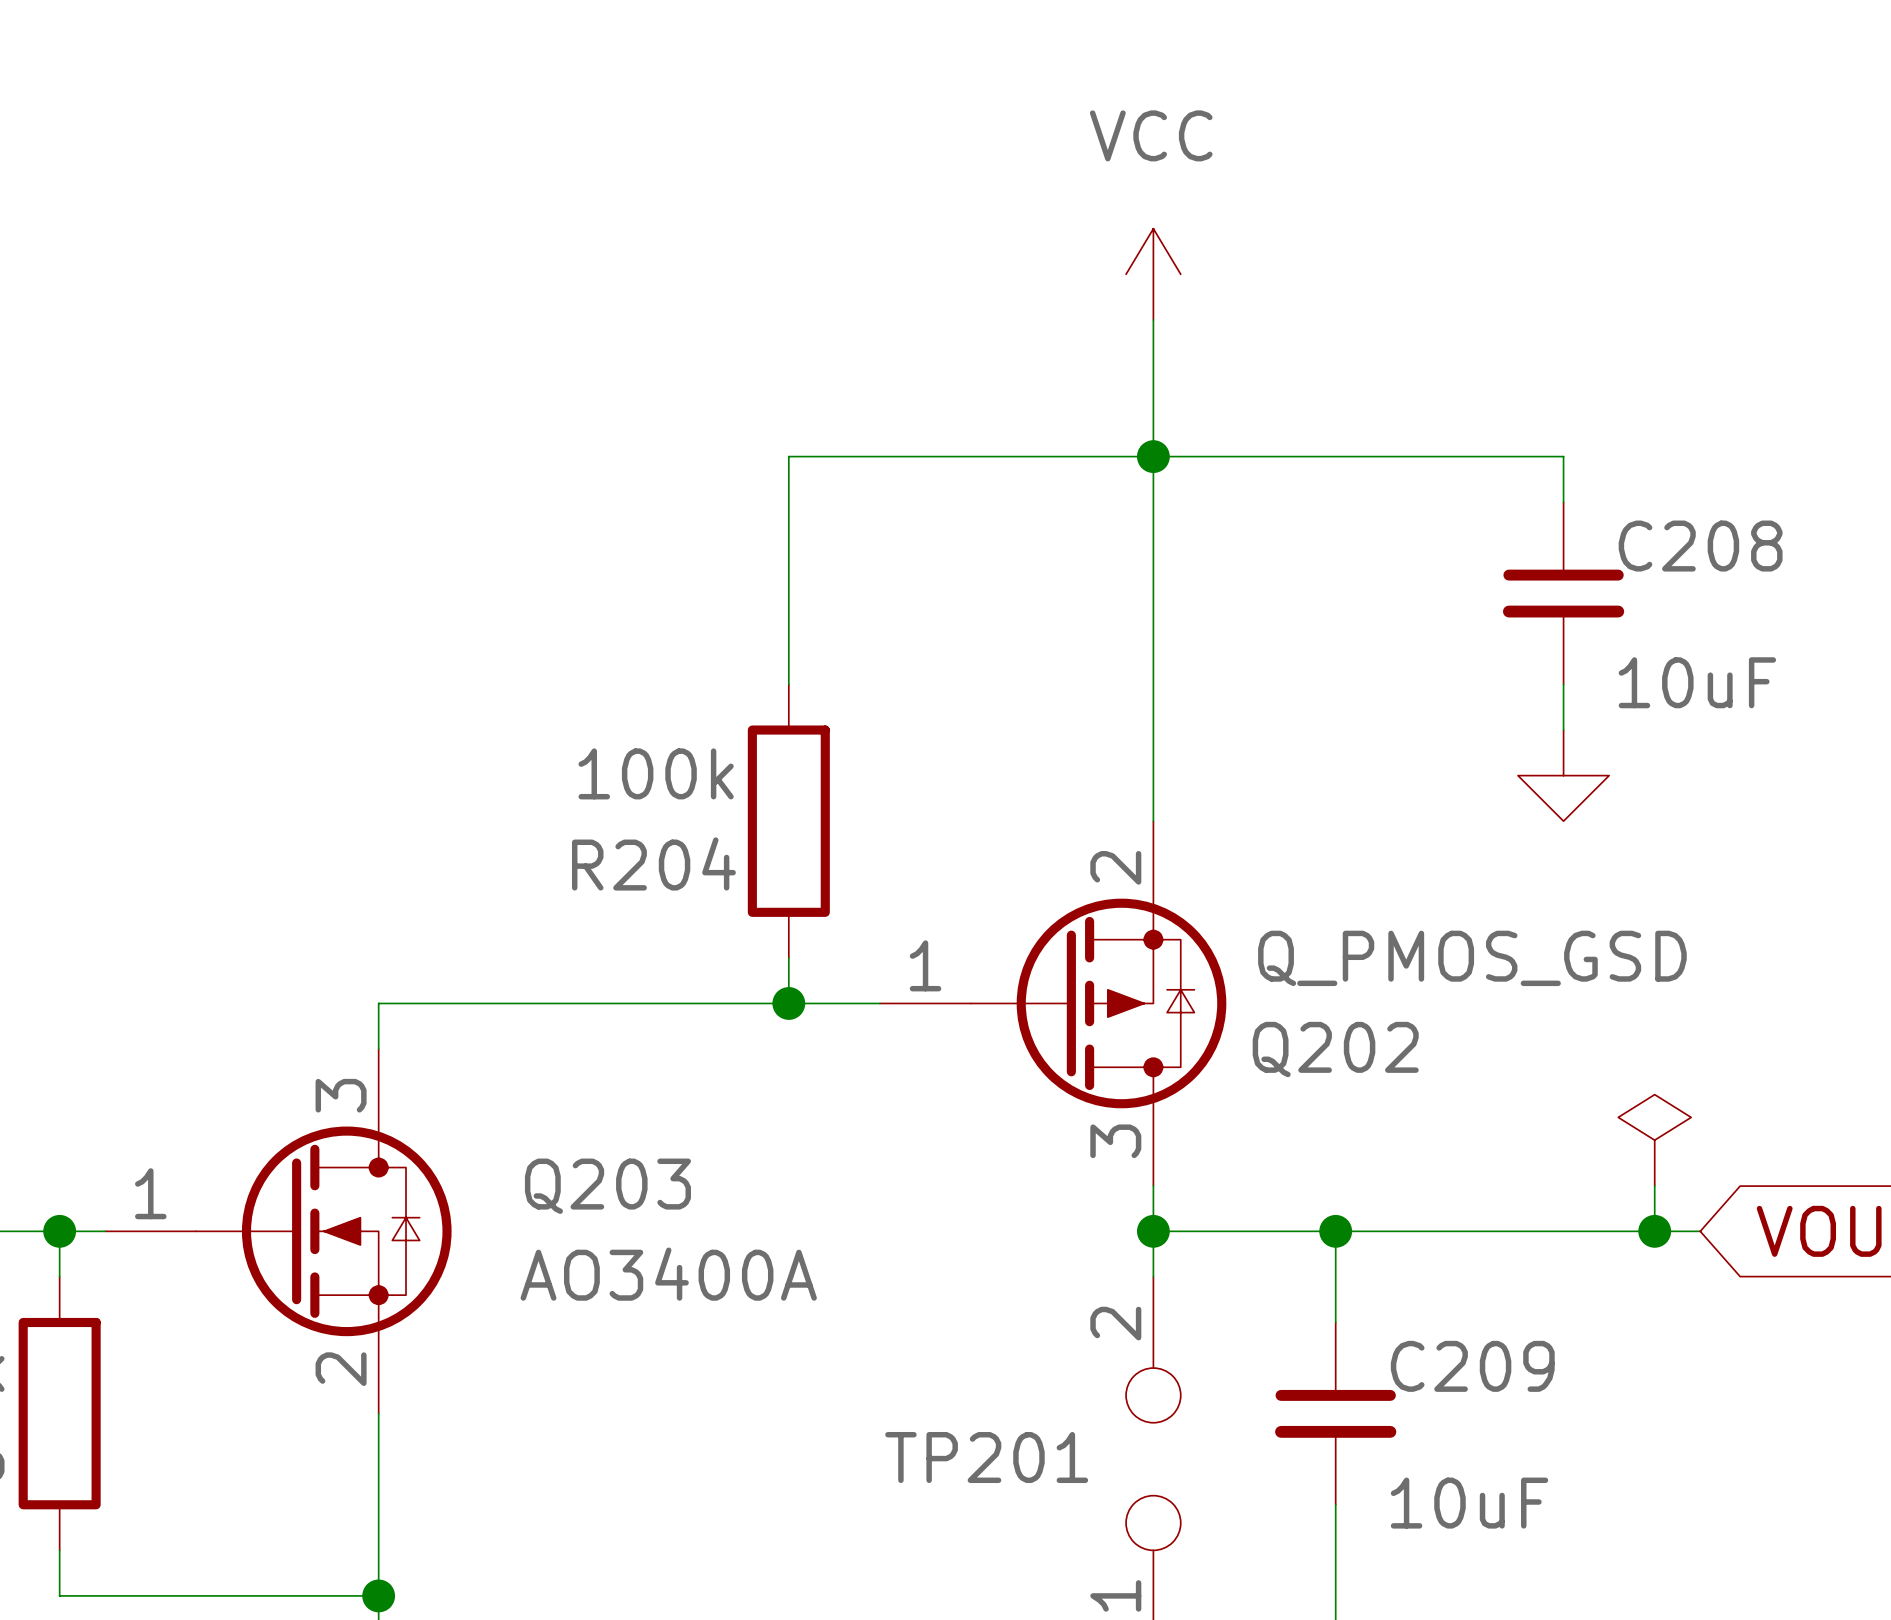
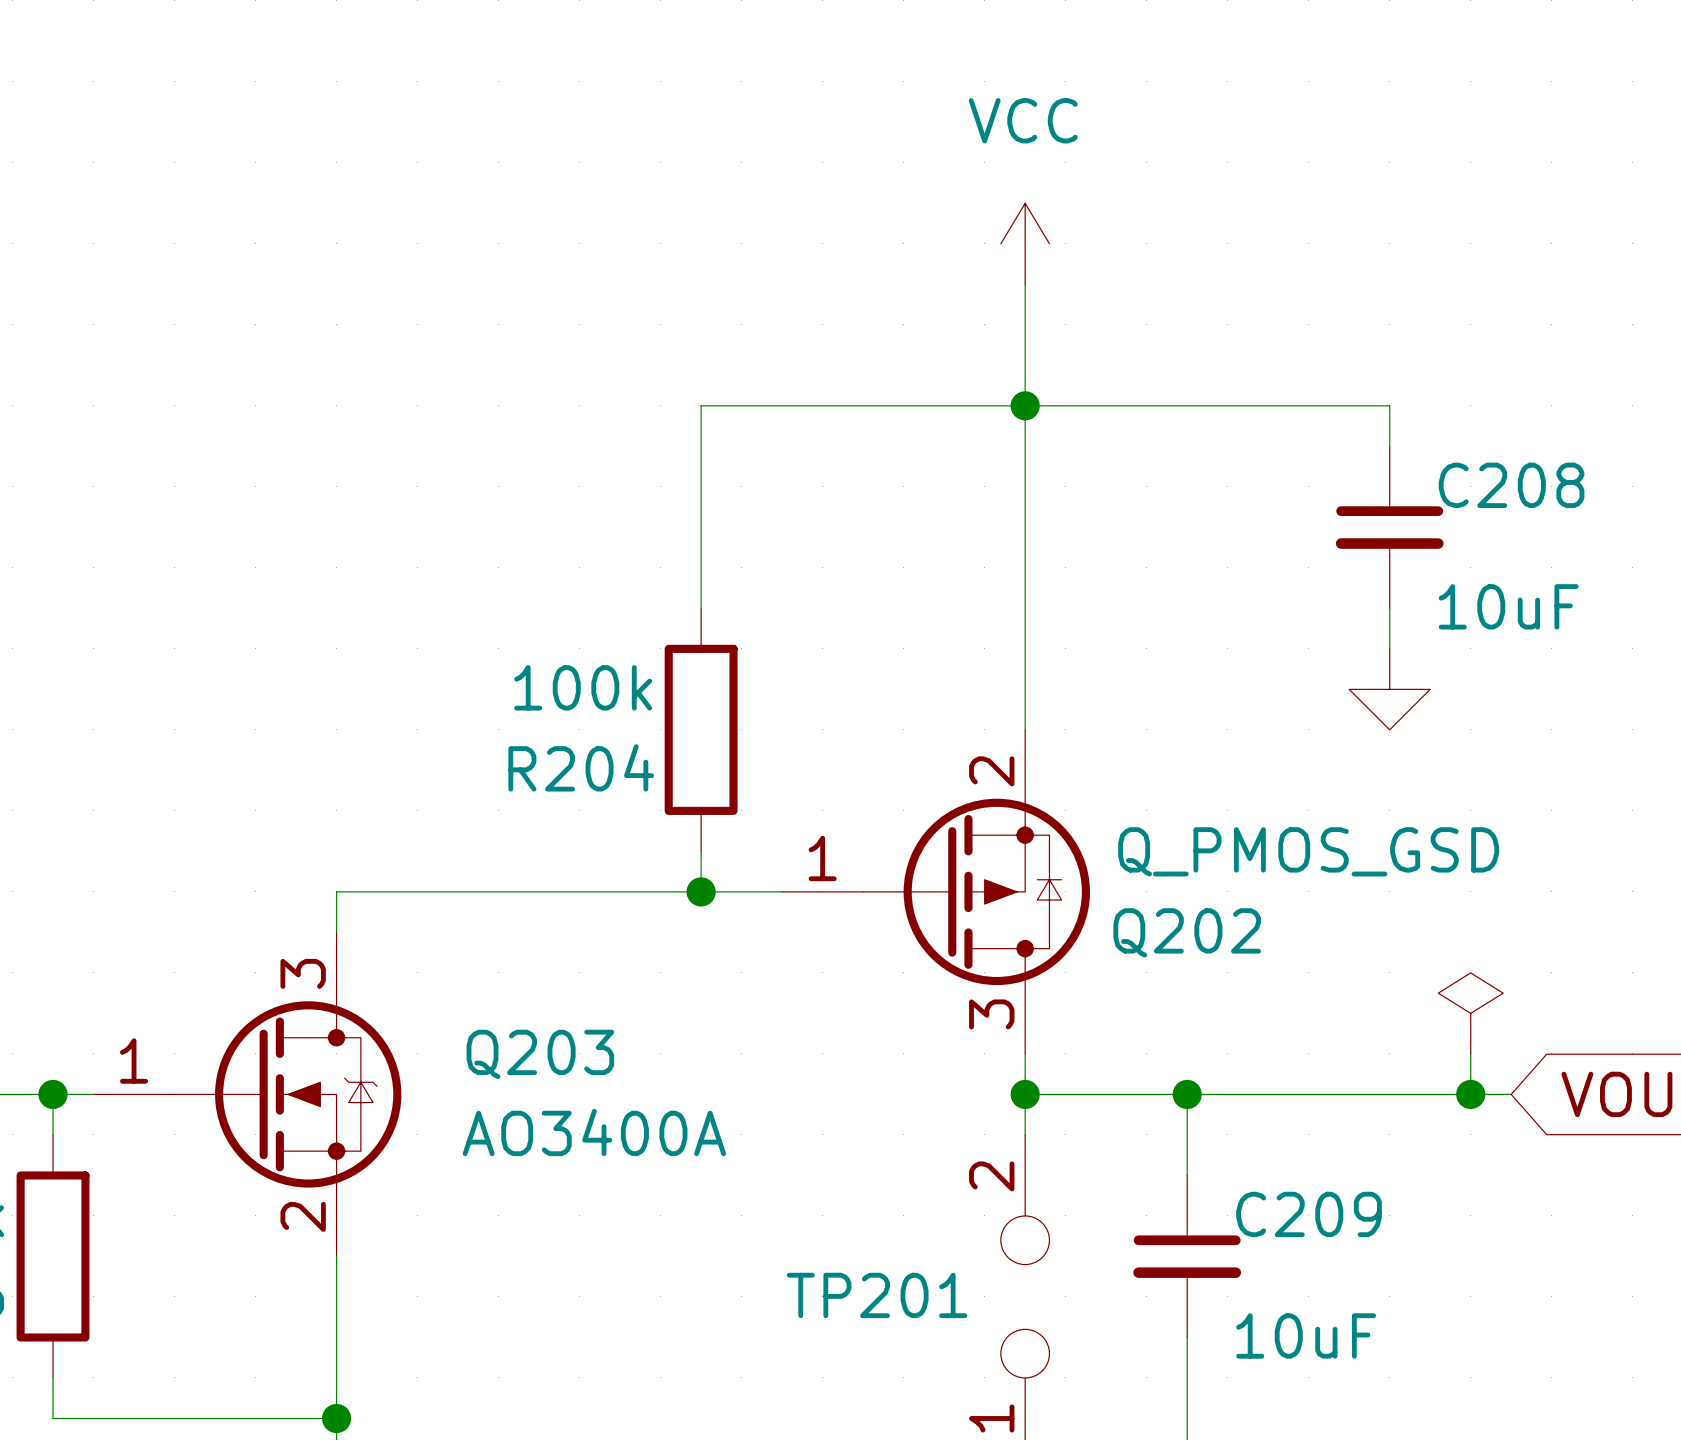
Q203 symbol: [105, 1049, 452, 1414] -> [93, 932, 402, 1257]

